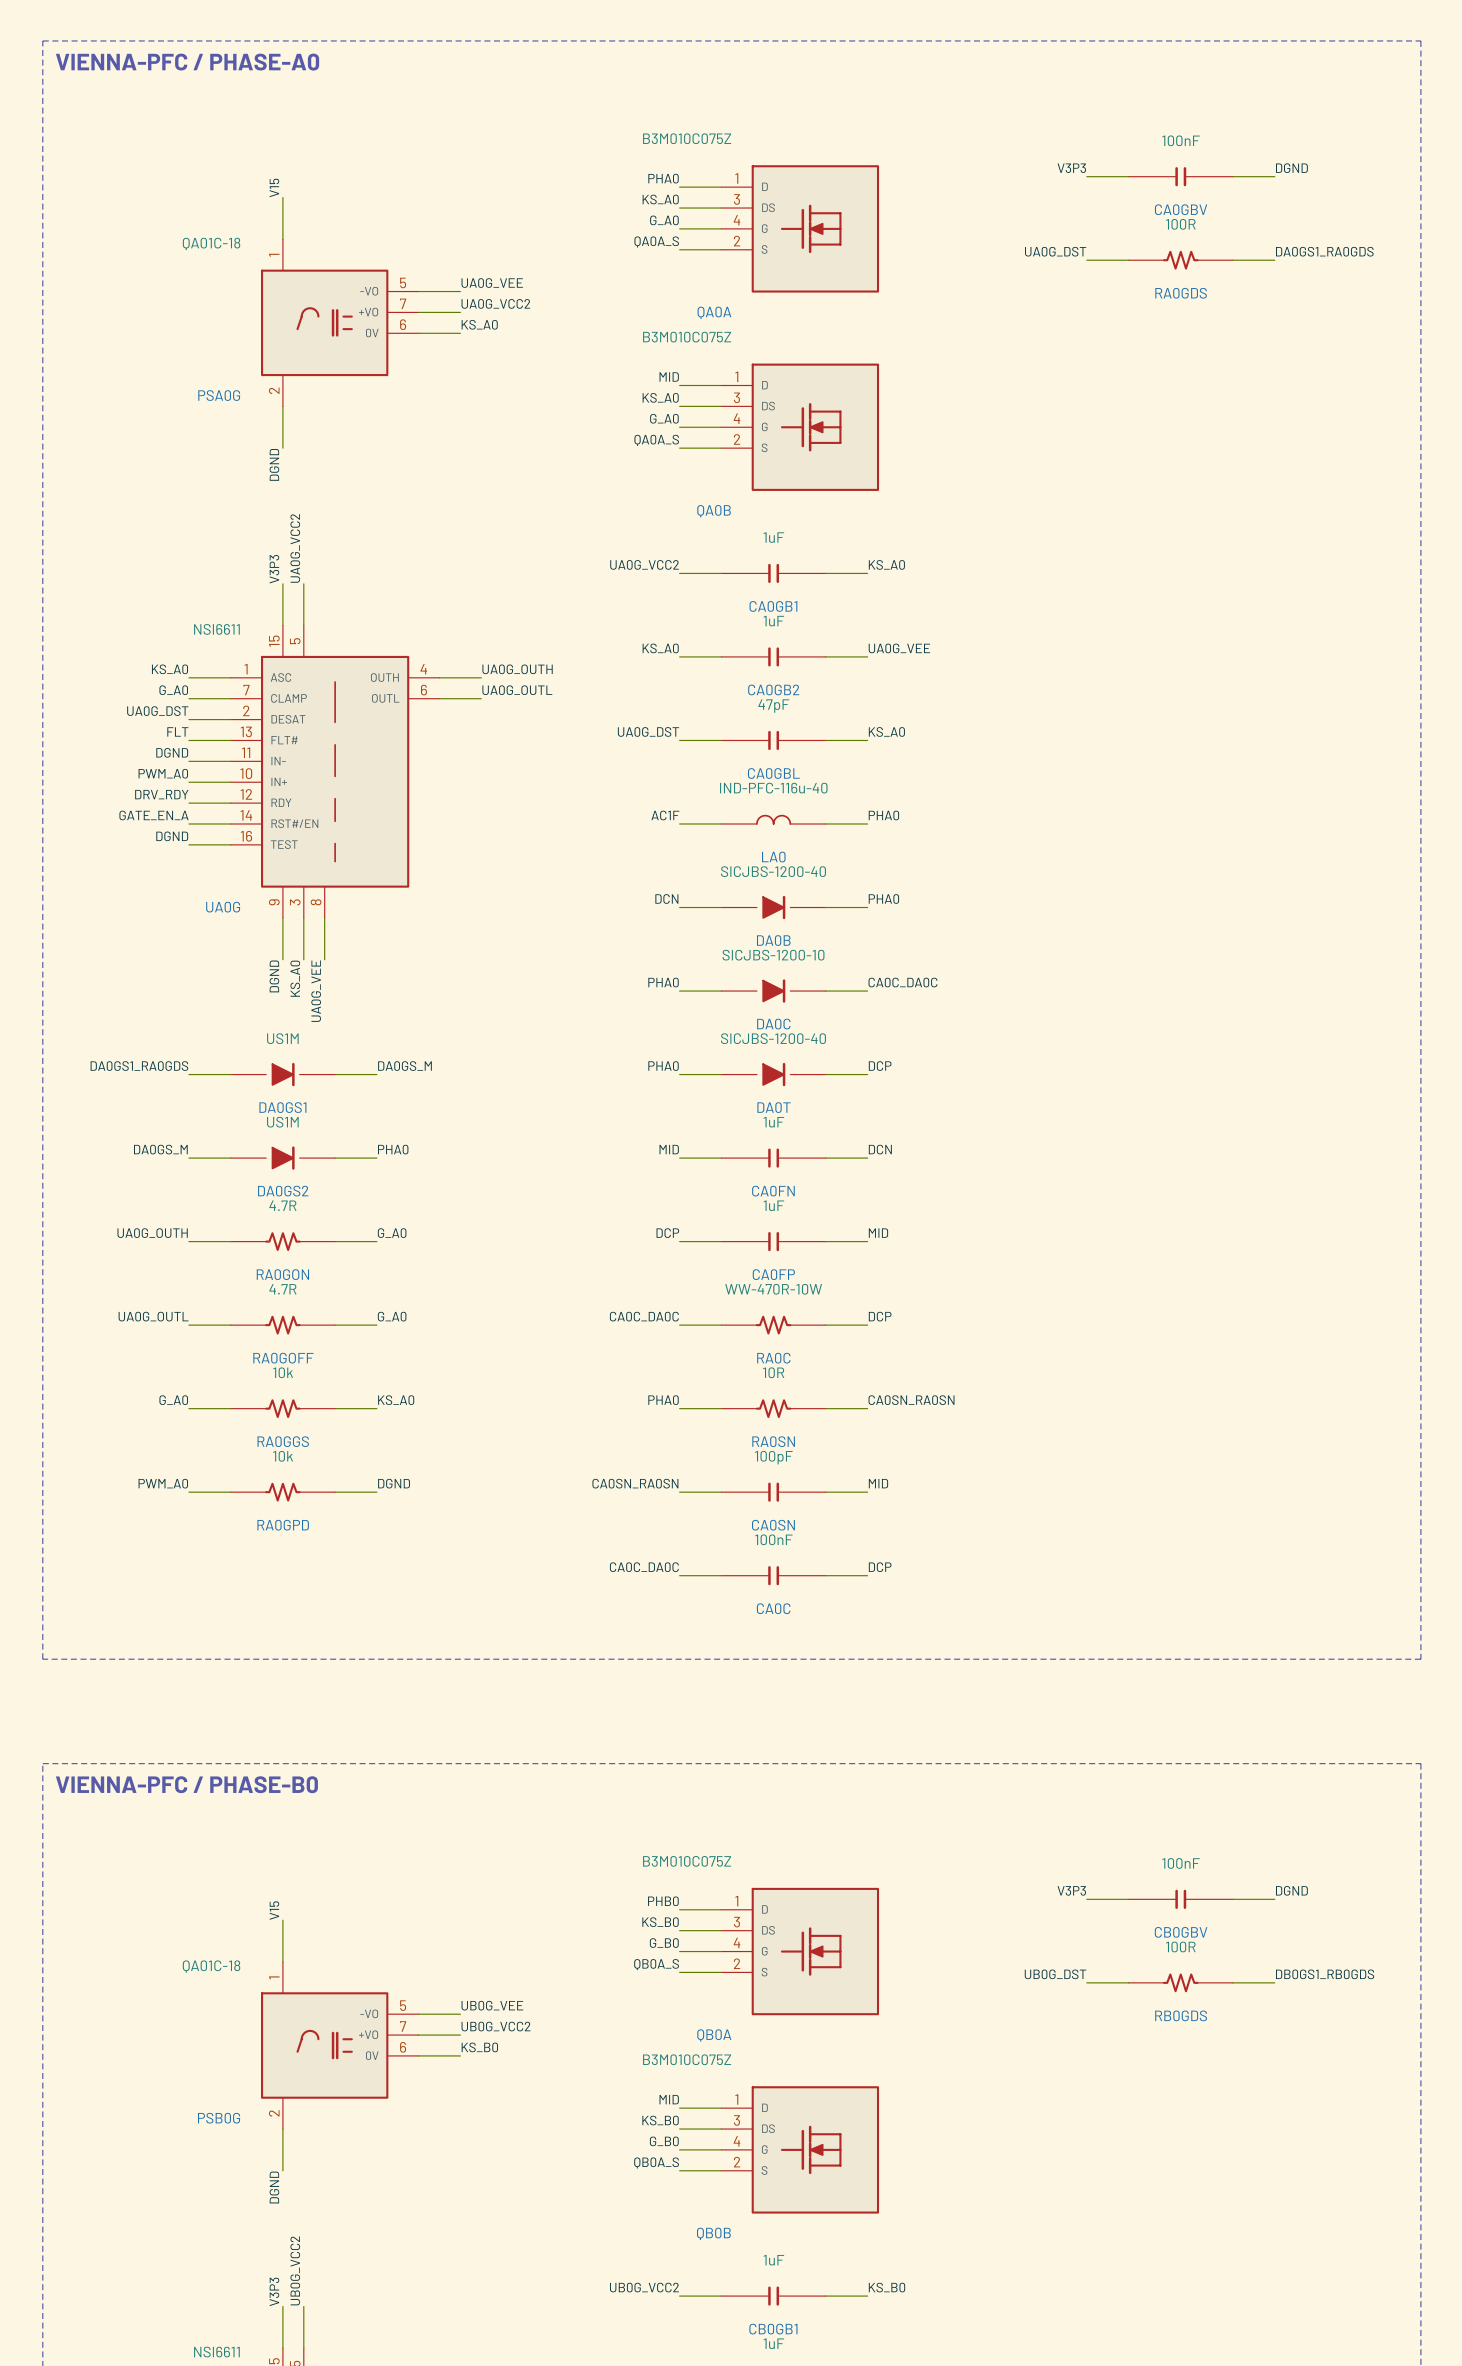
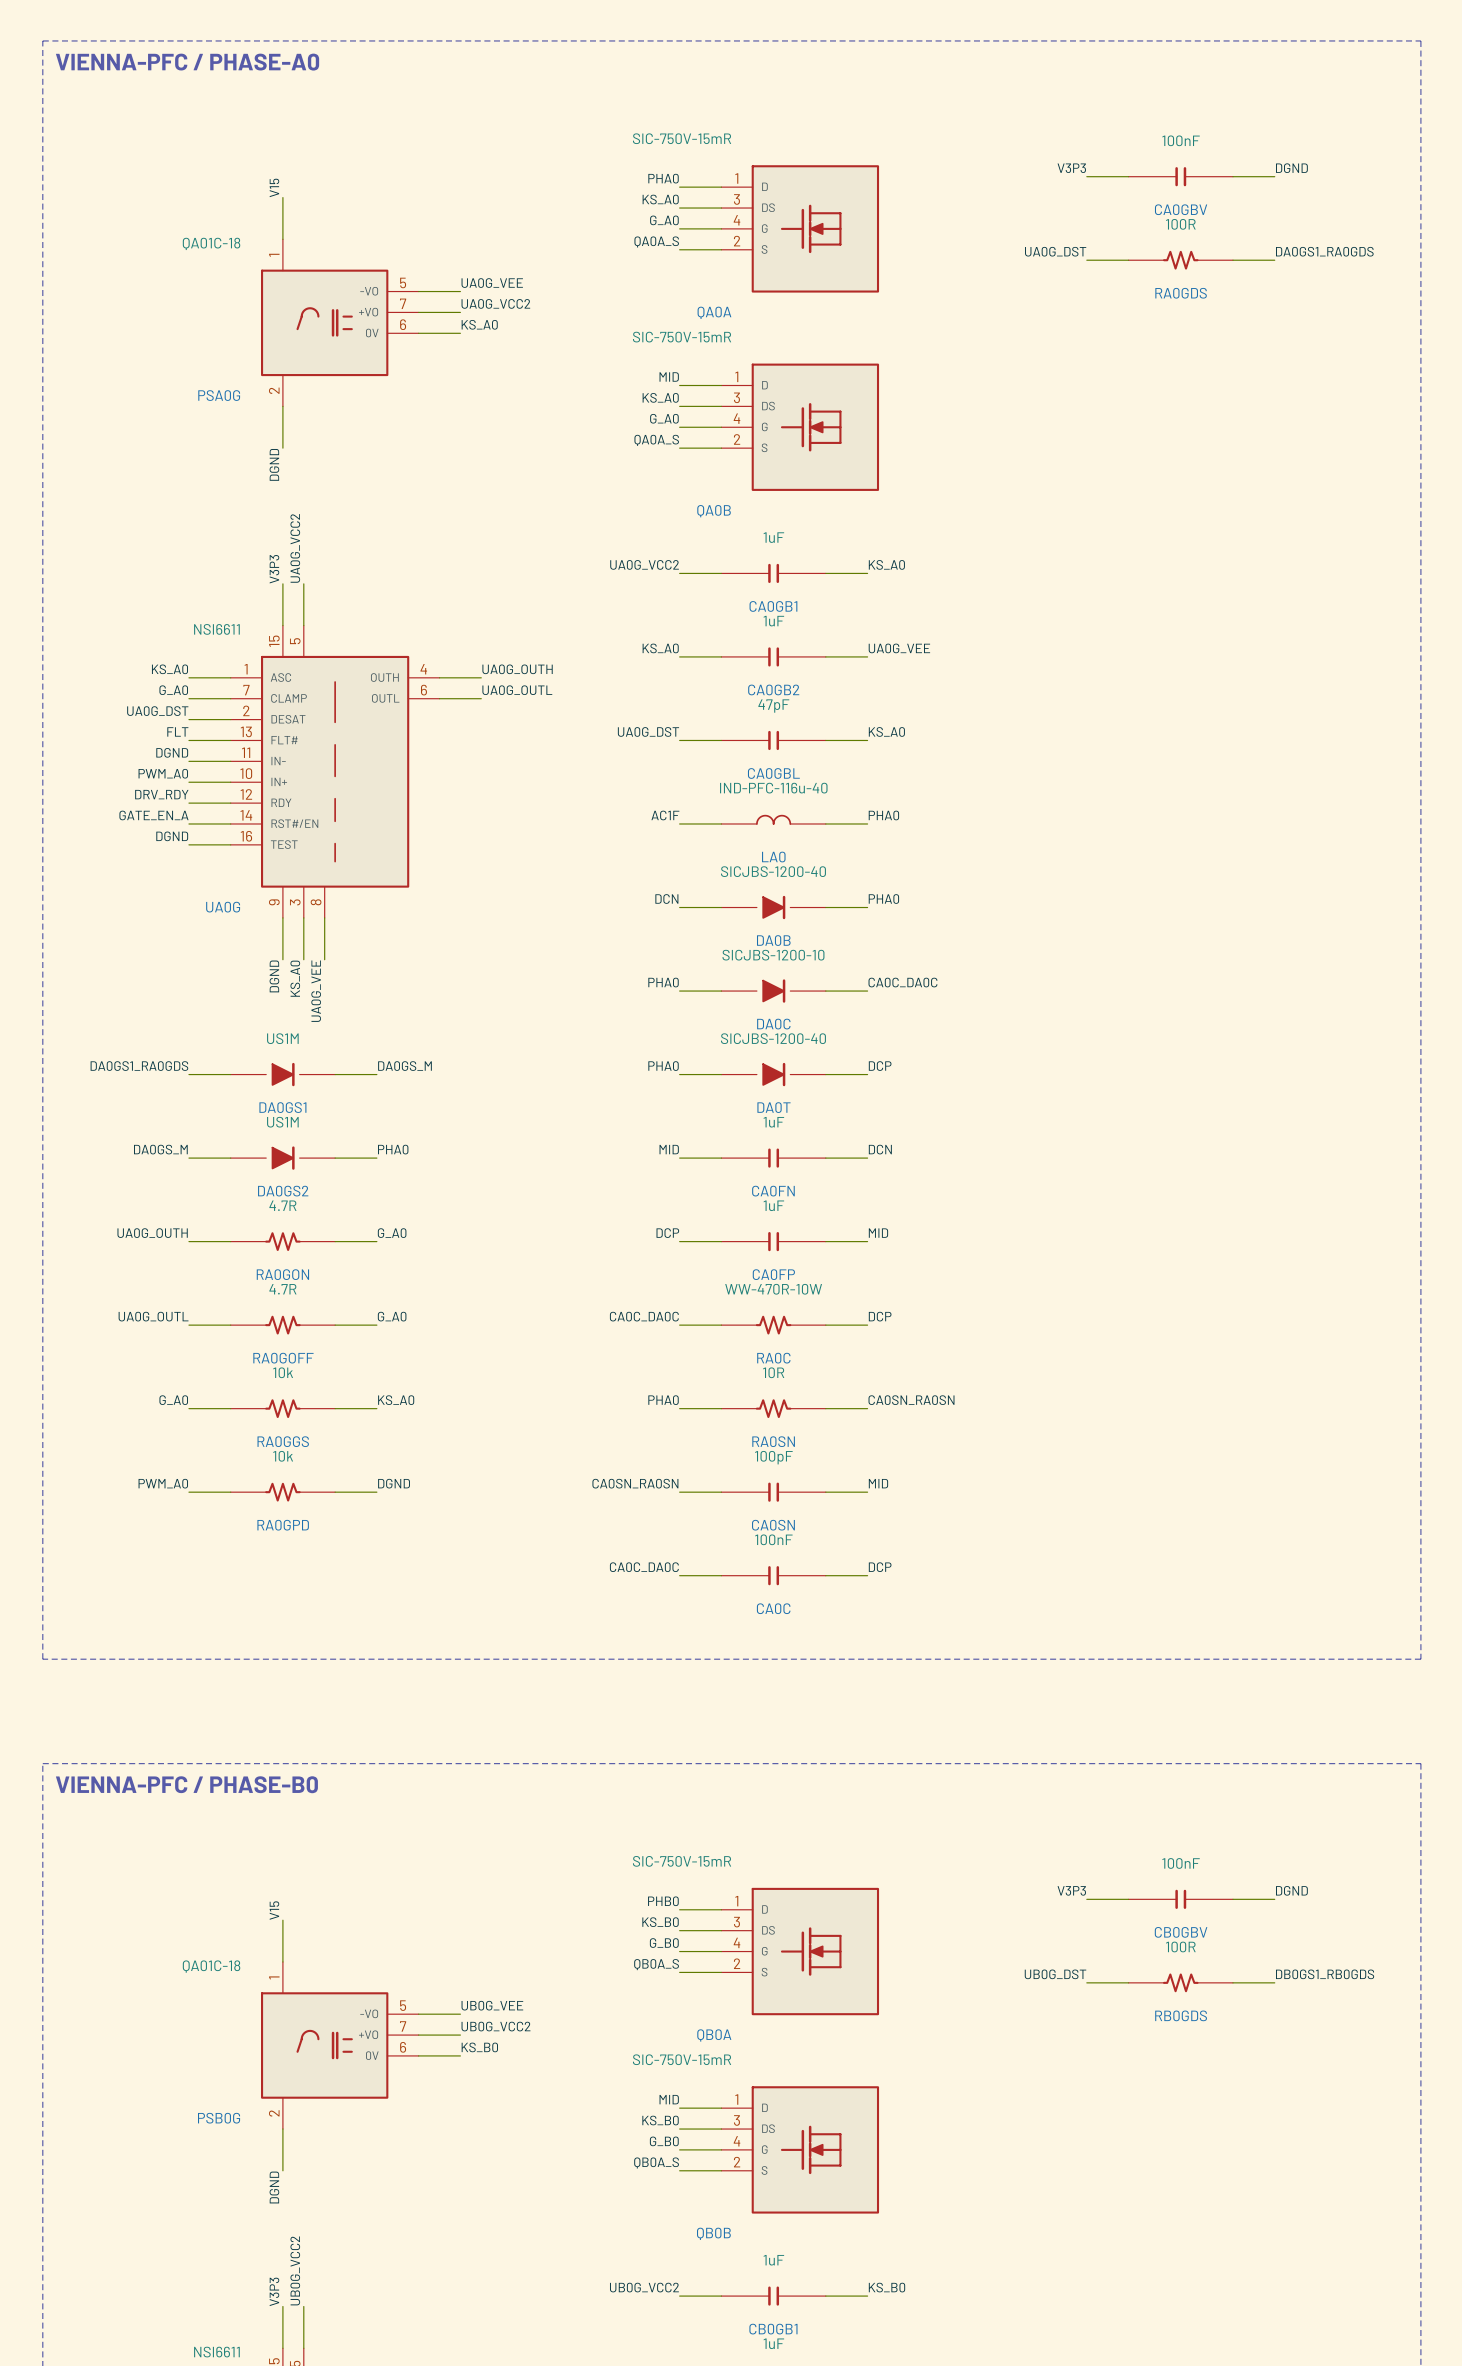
QA0A value: B3M010C075Z (687, 138) -> SIC-750V-15mR (682, 138)
QA0B value: B3M010C075Z (687, 337) -> SIC-750V-15mR (682, 337)
QB0A value: B3M010C075Z (687, 1861) -> SIC-750V-15mR (682, 1861)
QB0B value: B3M010C075Z (687, 2059) -> SIC-750V-15mR (682, 2059)

